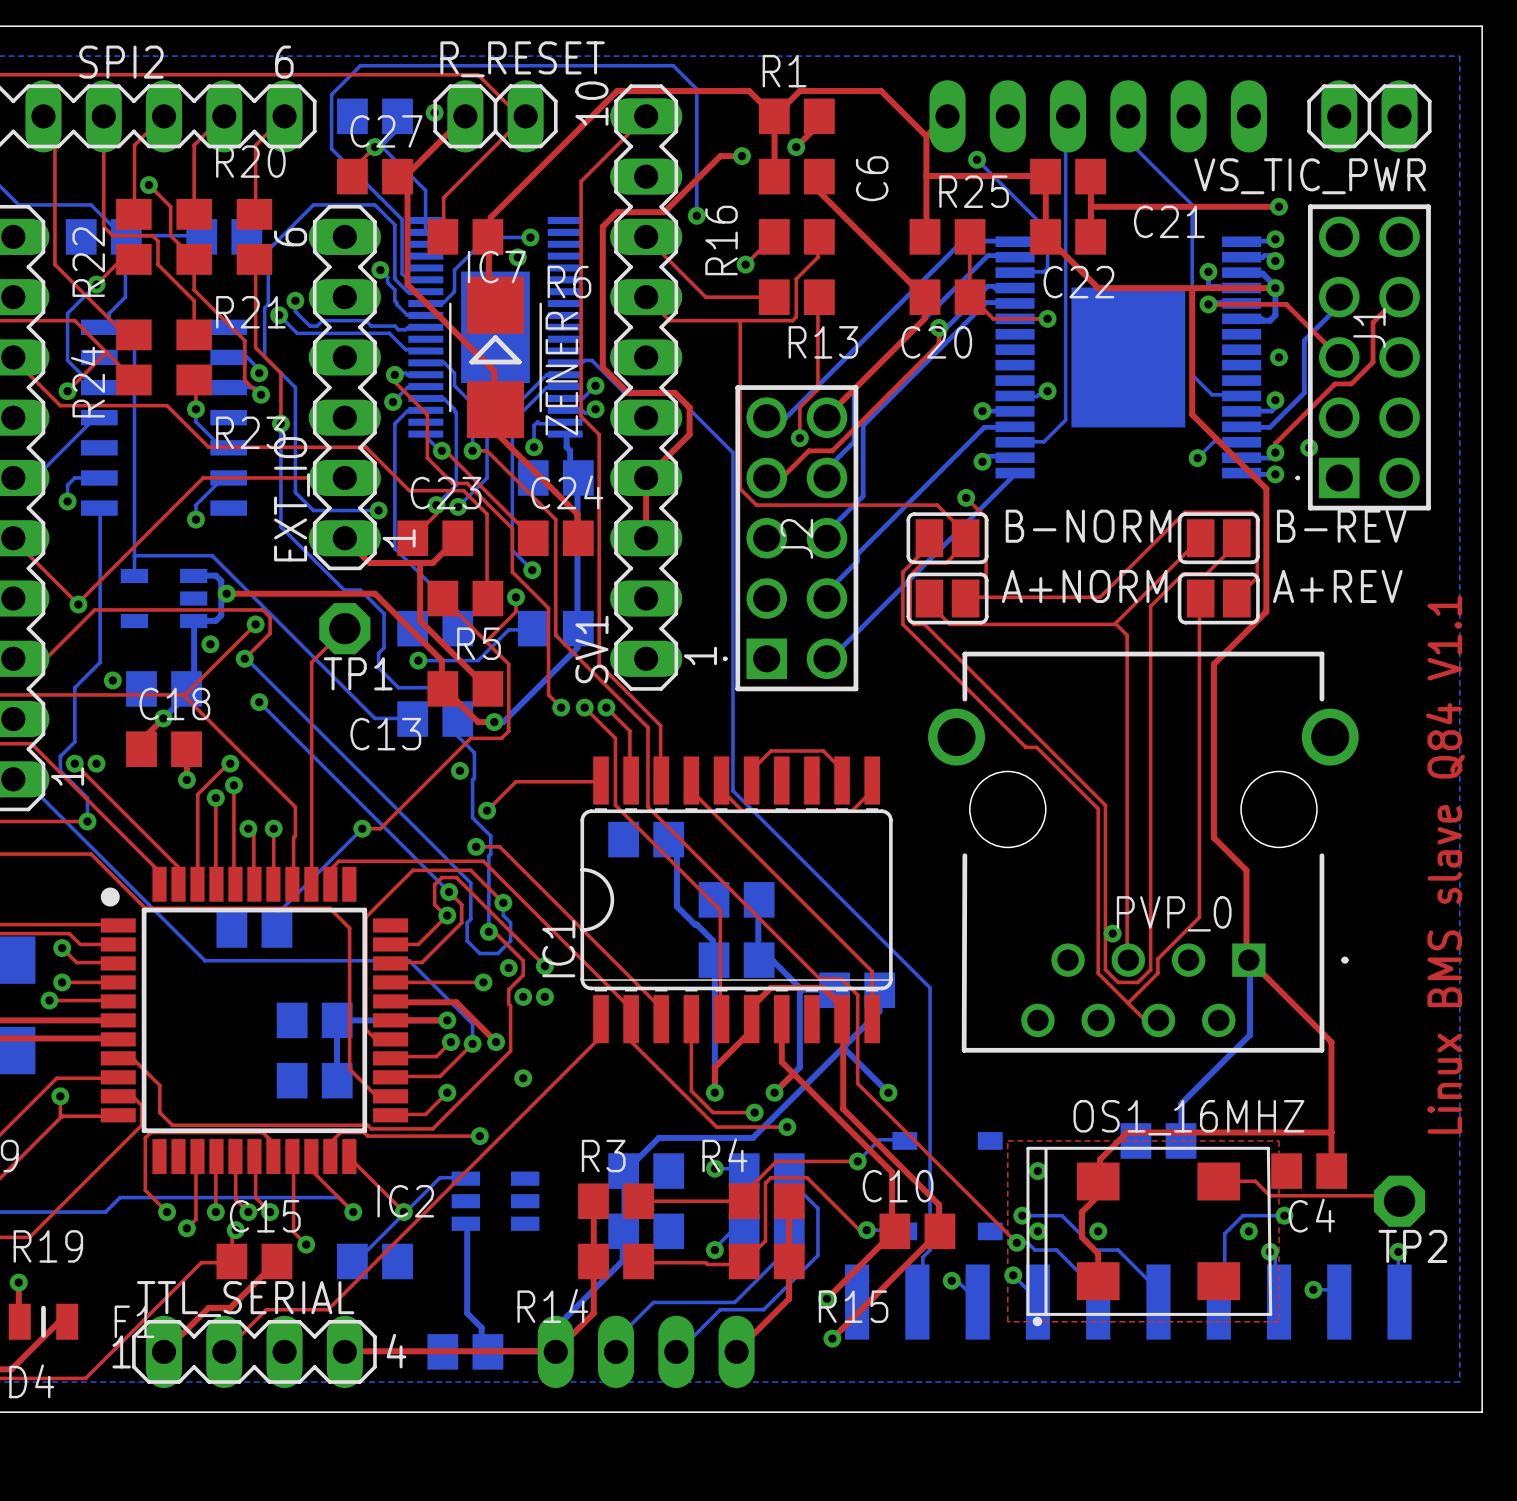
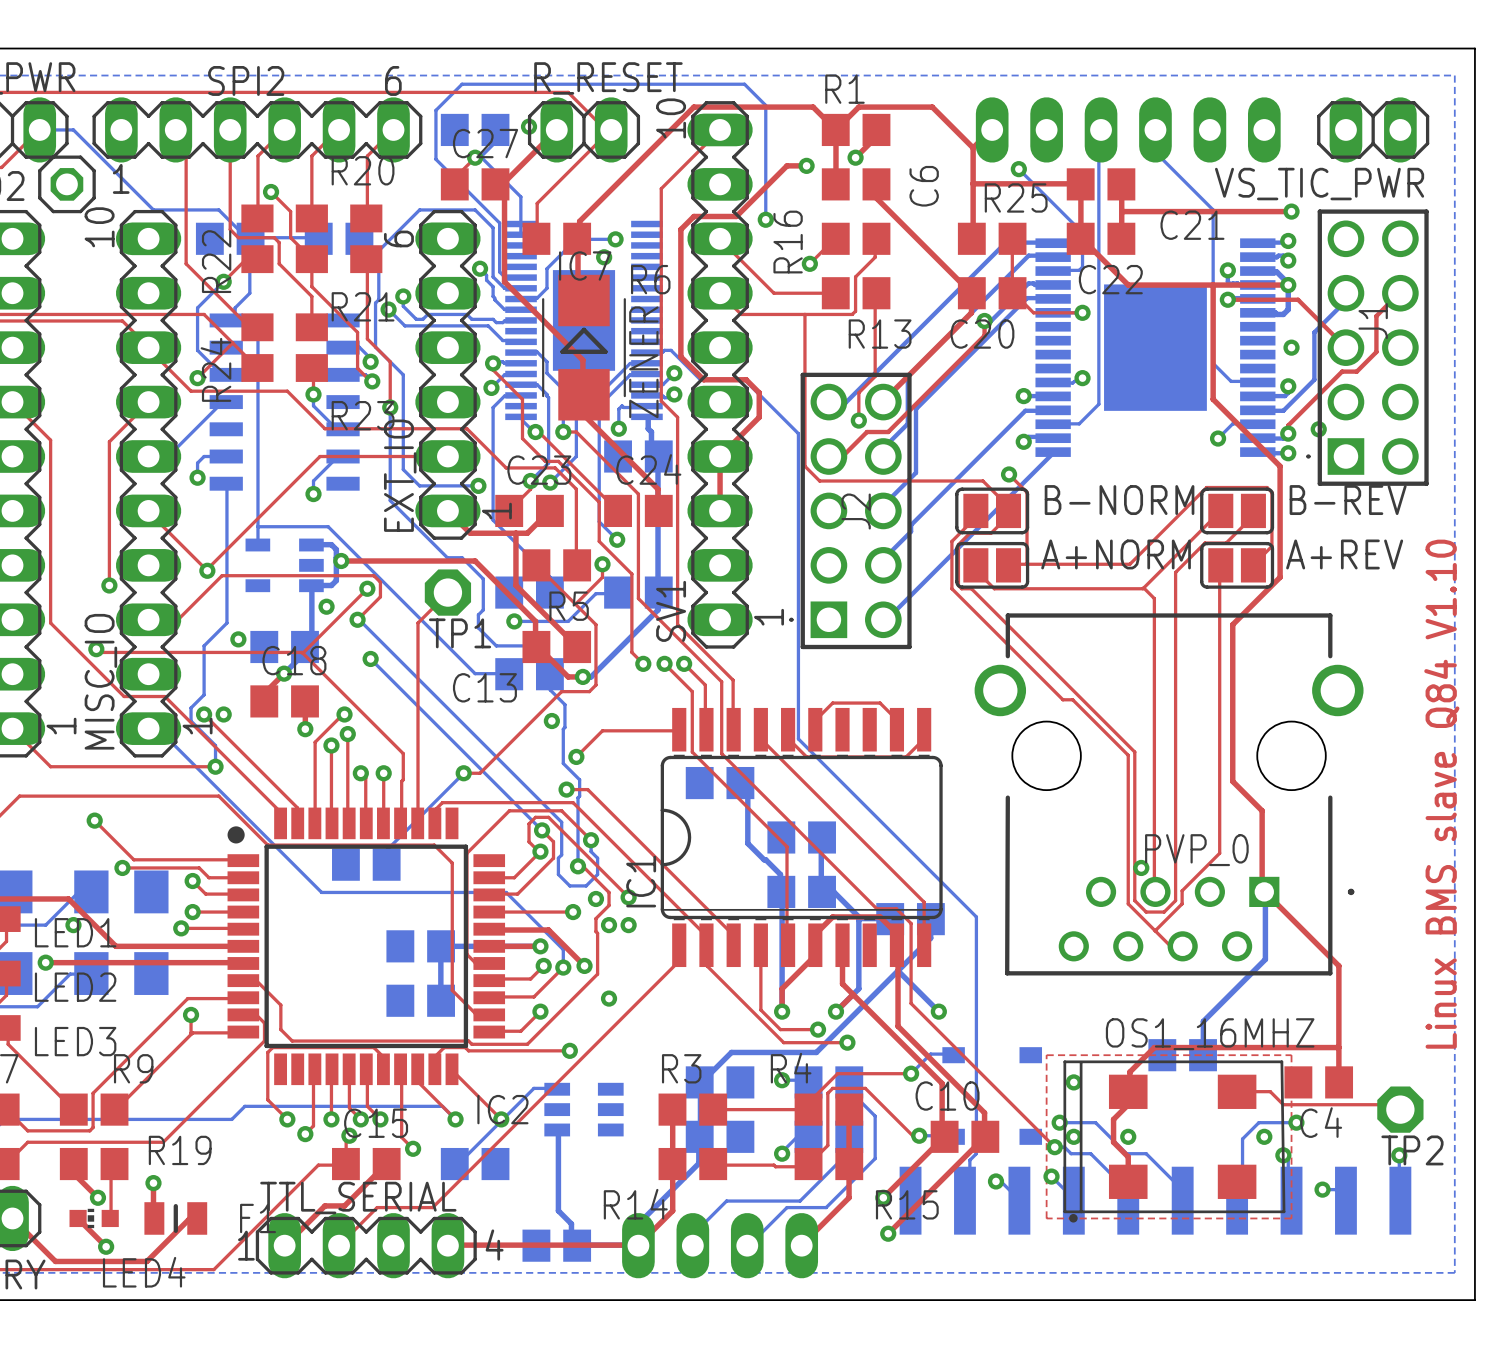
text: Linux BMS slave Q84 V1.1 (1445, 864) -> Linux BMS slave Q84 V1.10 (1441, 794)

